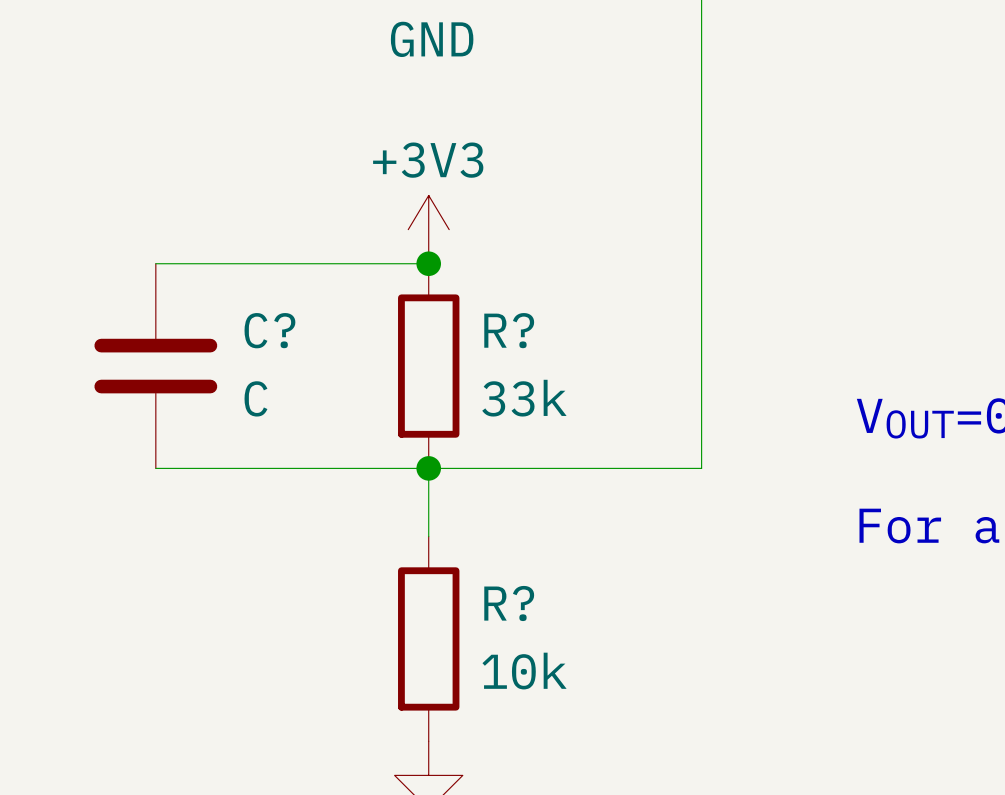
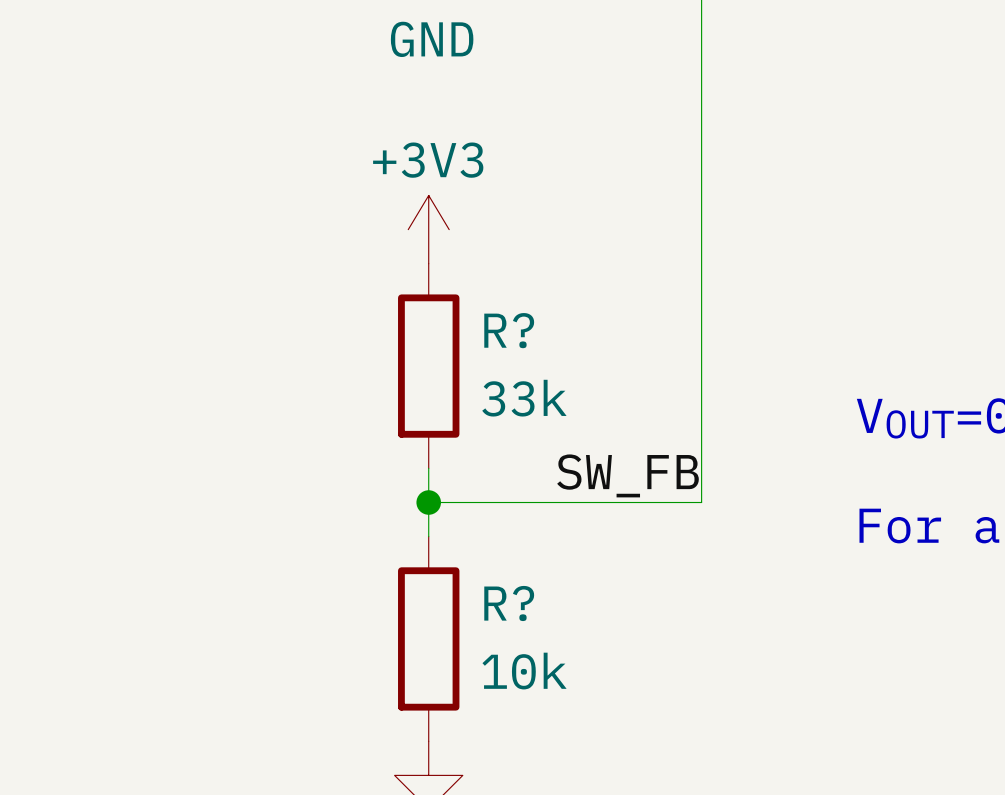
wire: (155, 263) (428, 263) -> none
junction: (428, 263) -> none
C?: C (155, 366) -> none
wire: (155, 468) (701, 468) -> (428, 502) (701, 502) (701, 468)
junction position: (428, 468) -> (428, 502)
label: none -> SW_FB (628, 475)

